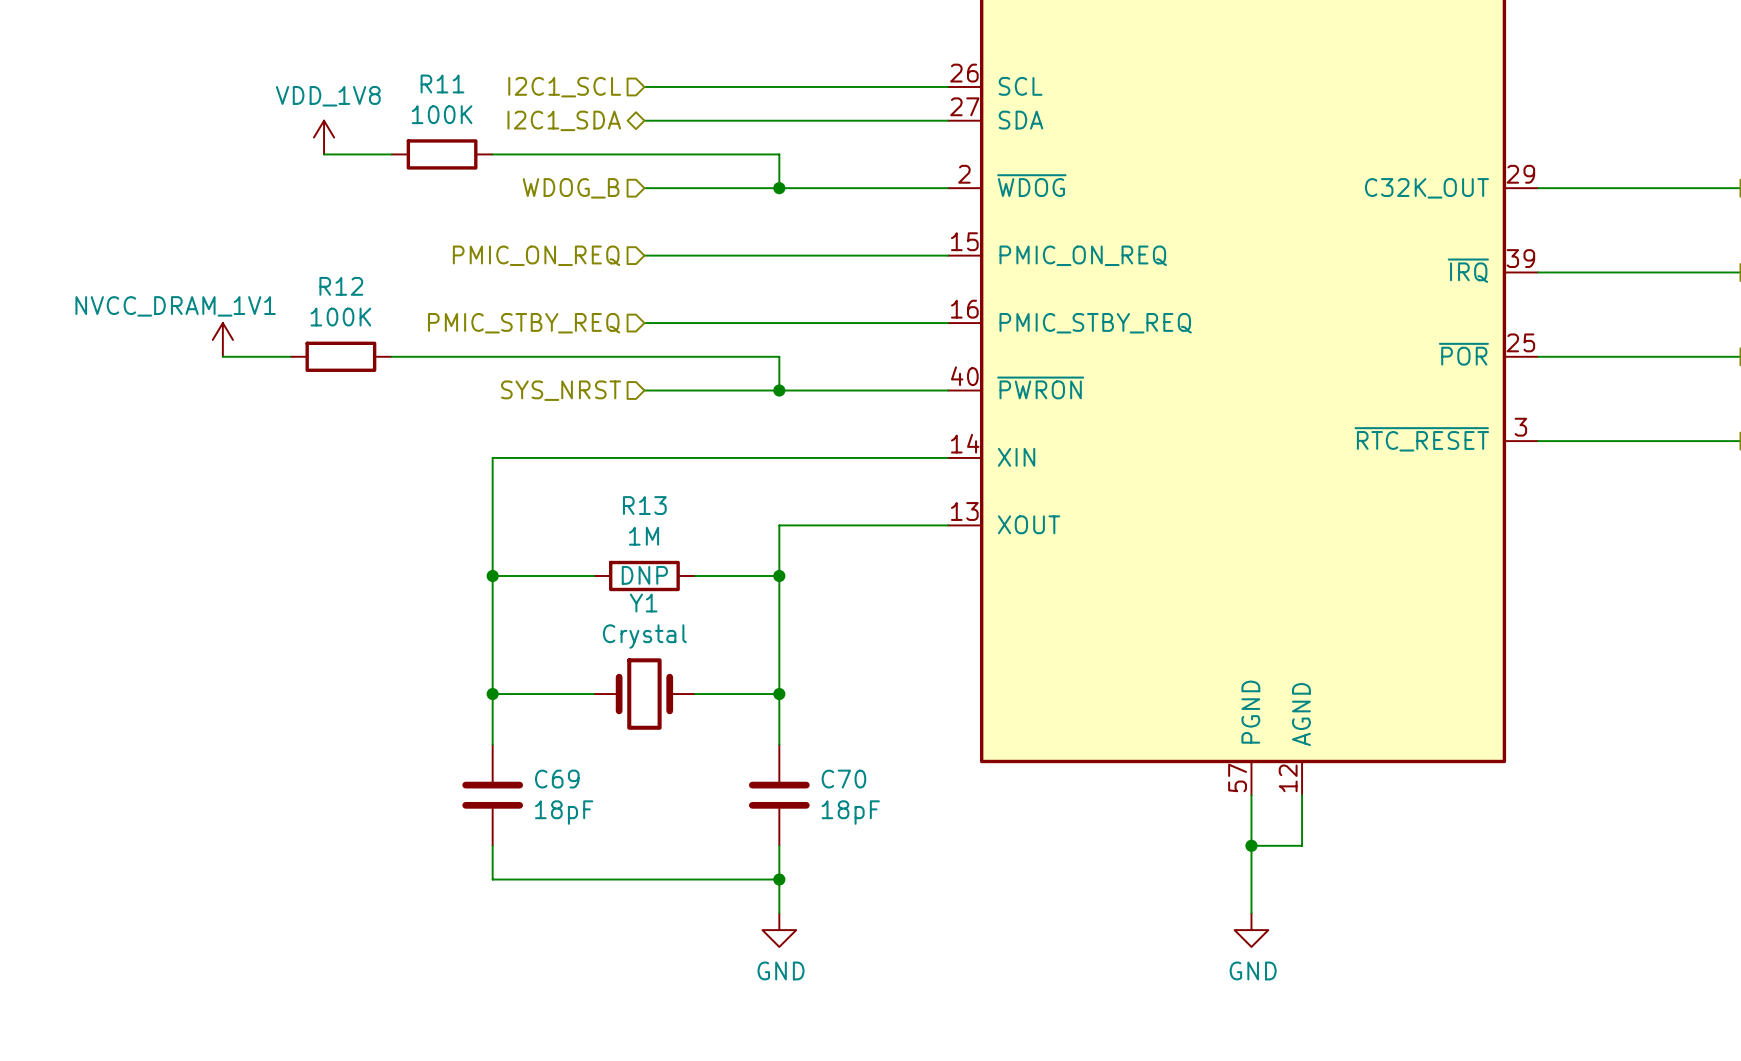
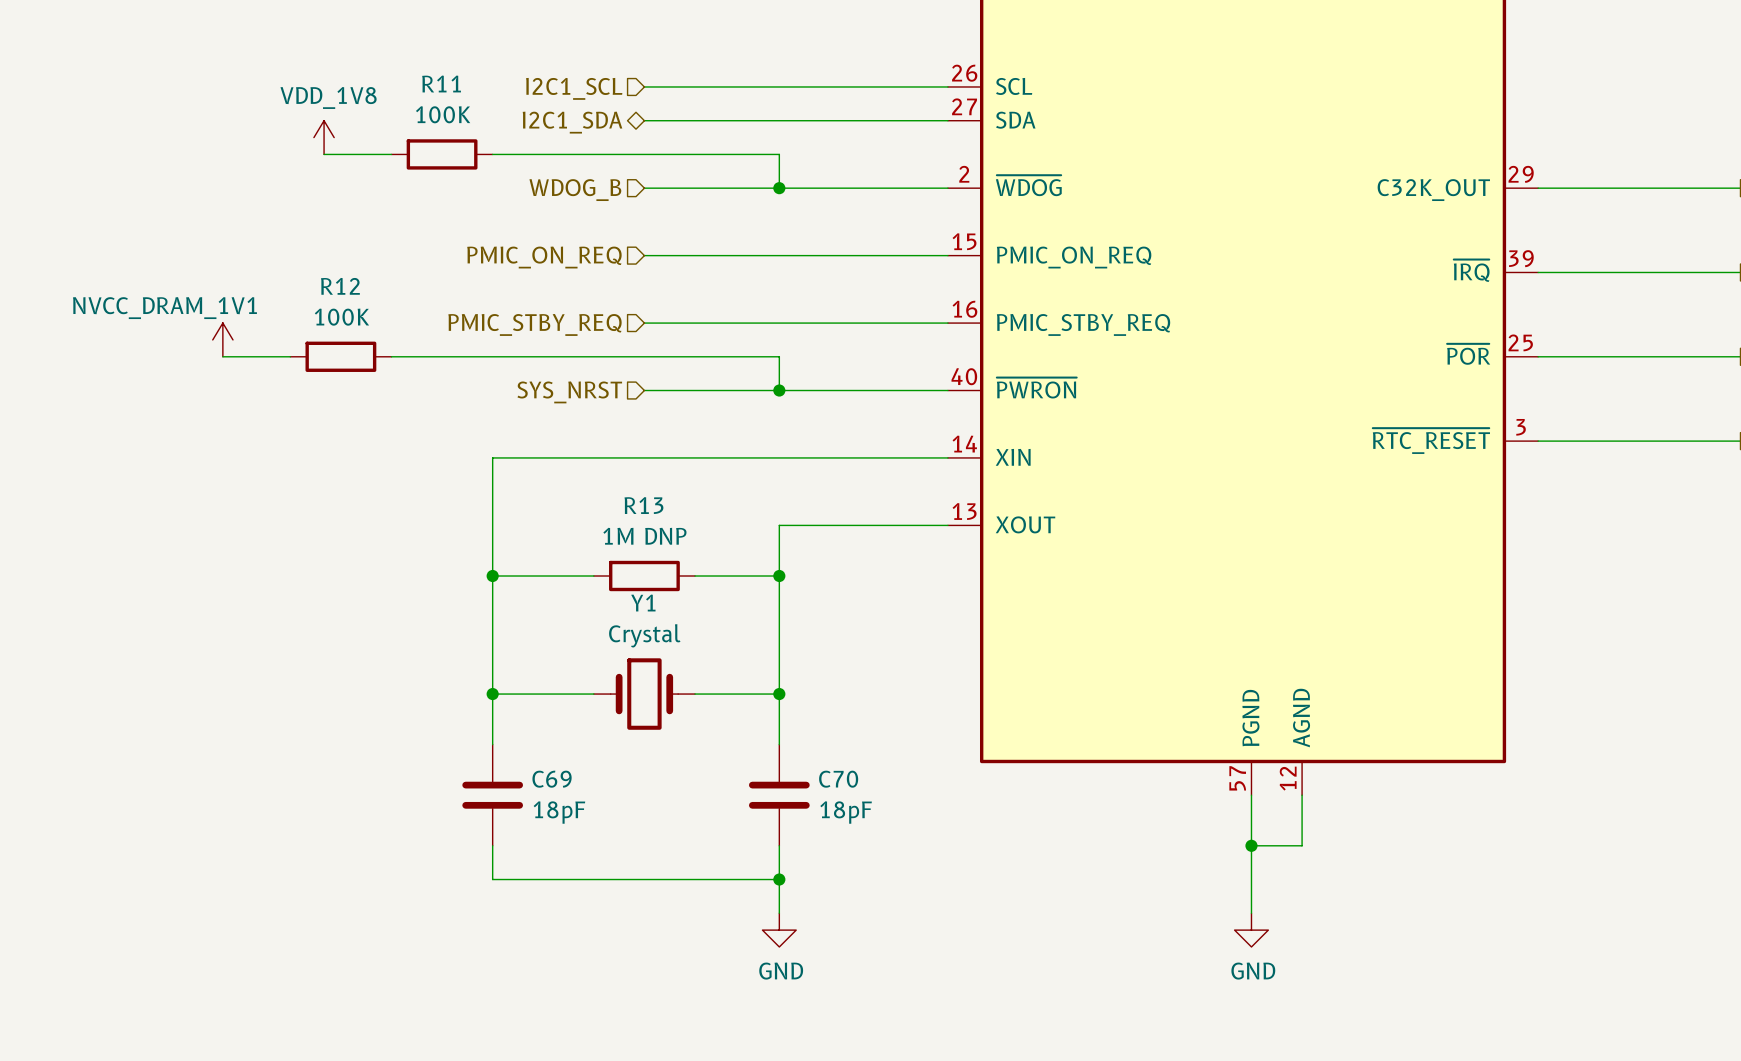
R13 value: 1M (644, 536) -> 1M DNP (644, 536)
R13 text: DNP (644, 575) -> none

